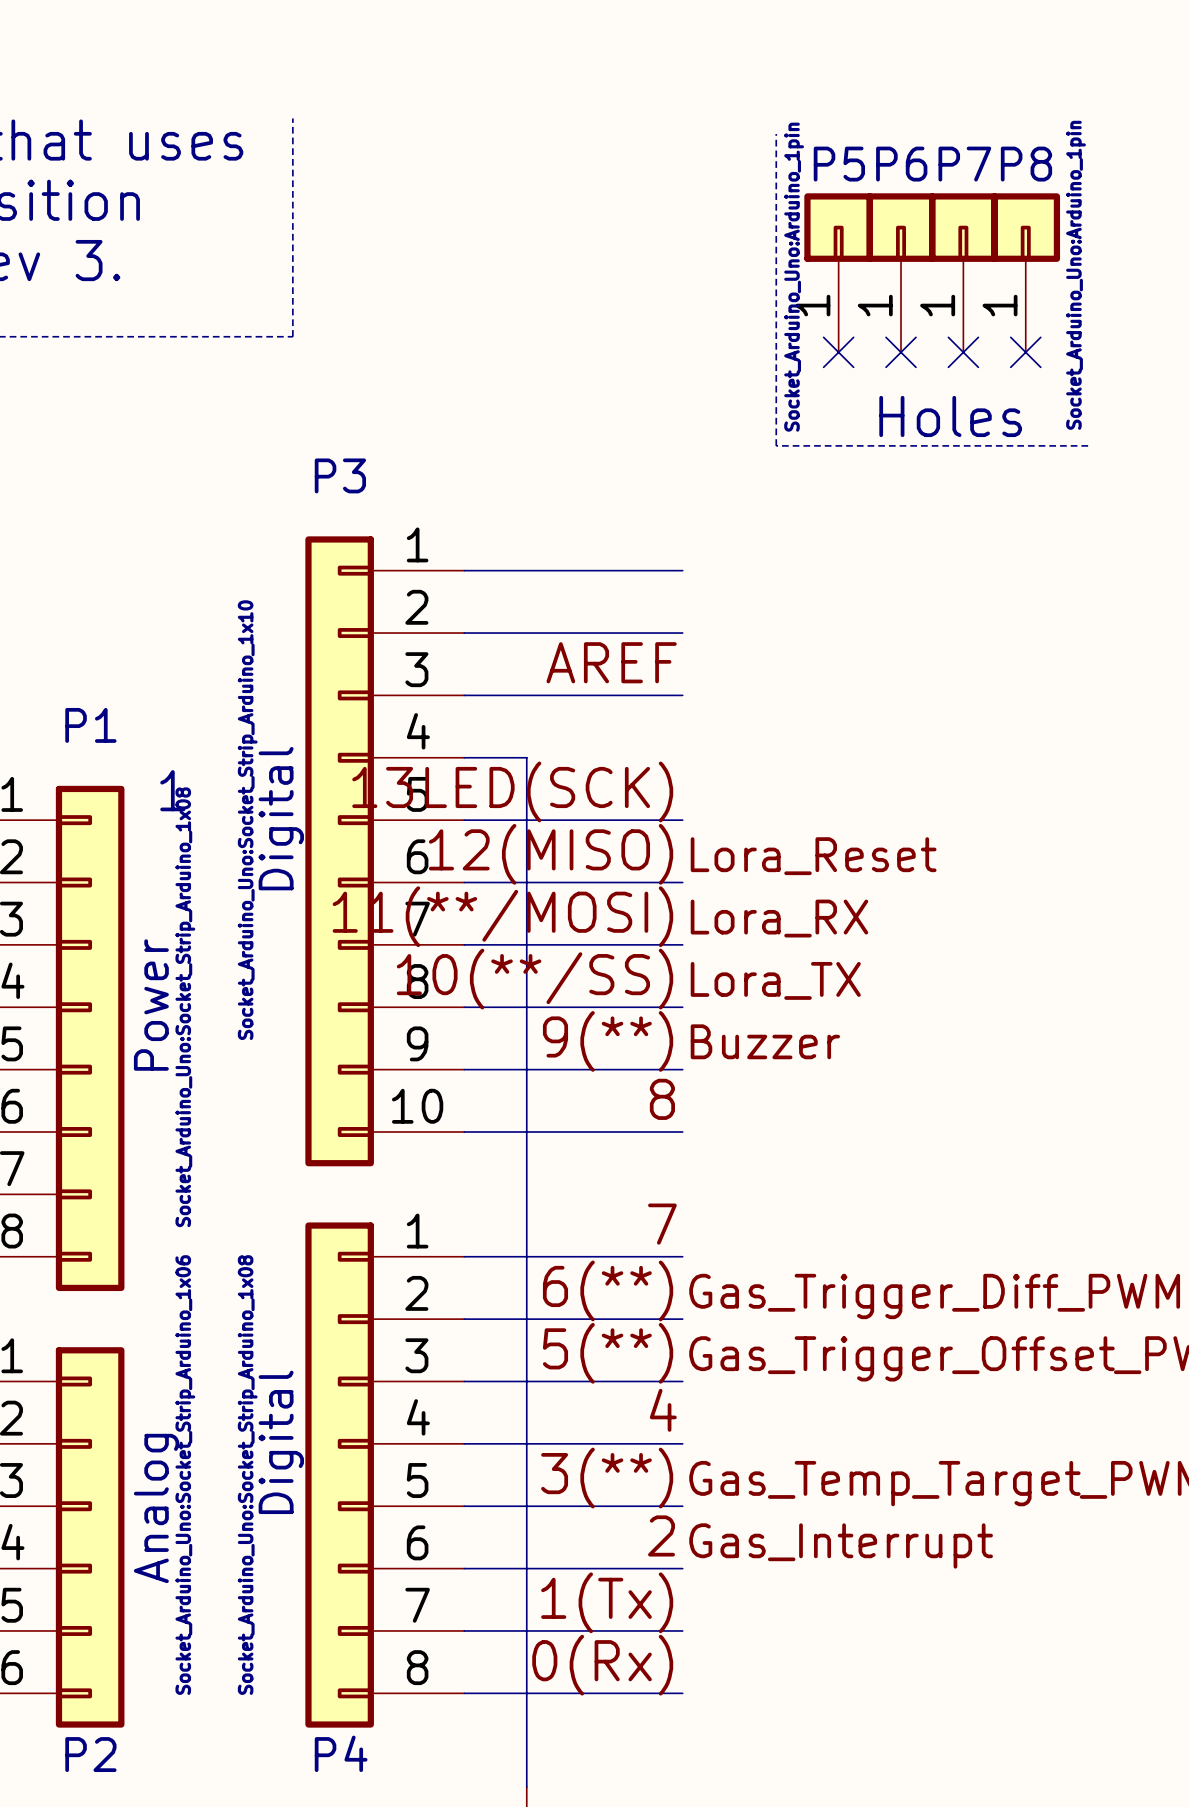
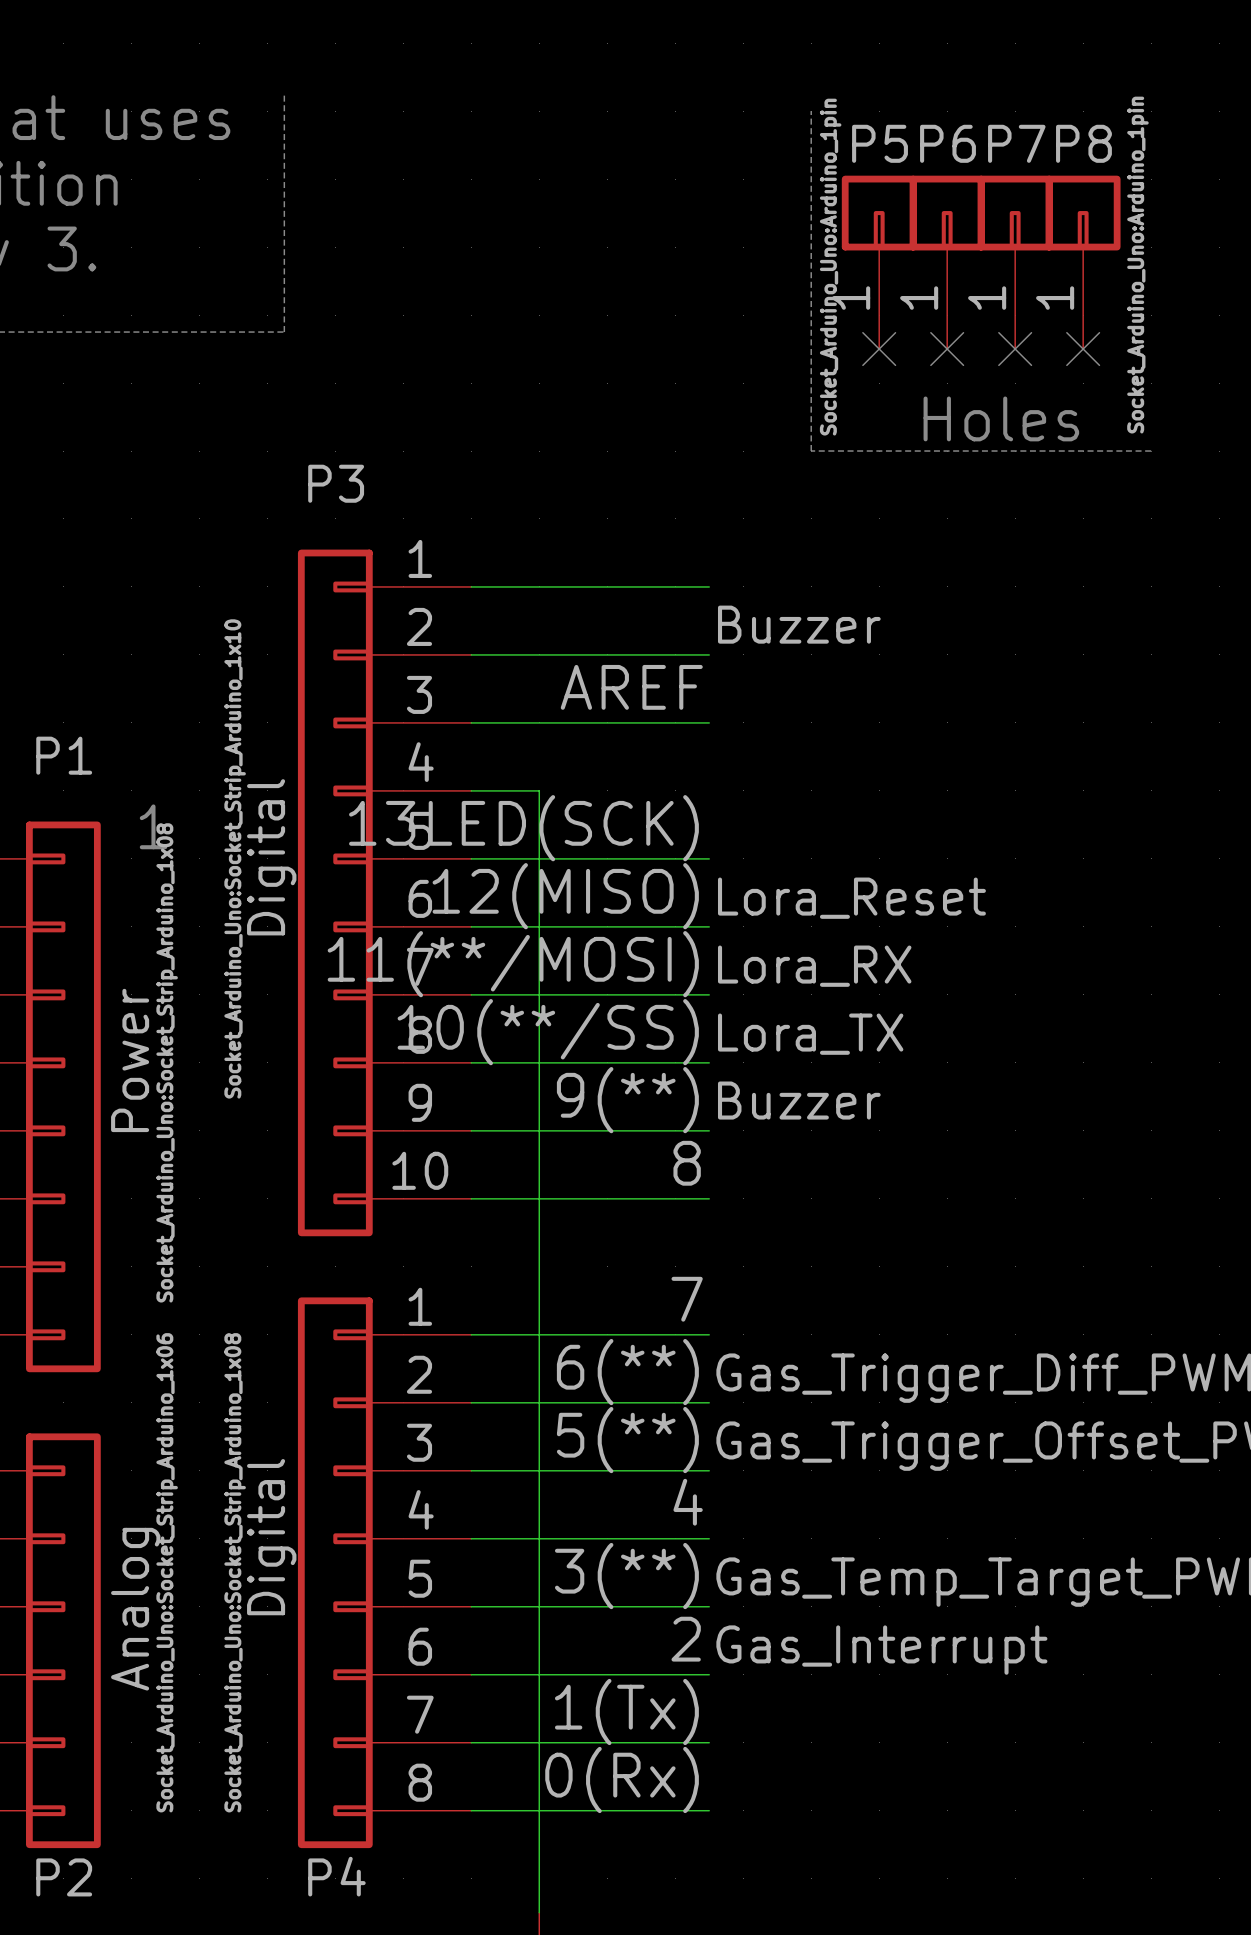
label: none -> Buzzer (799, 624)

